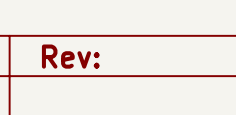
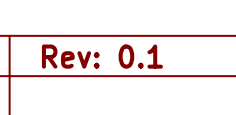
title block: Rev: (70, 56) -> Rev: 0.1 (102, 56)

